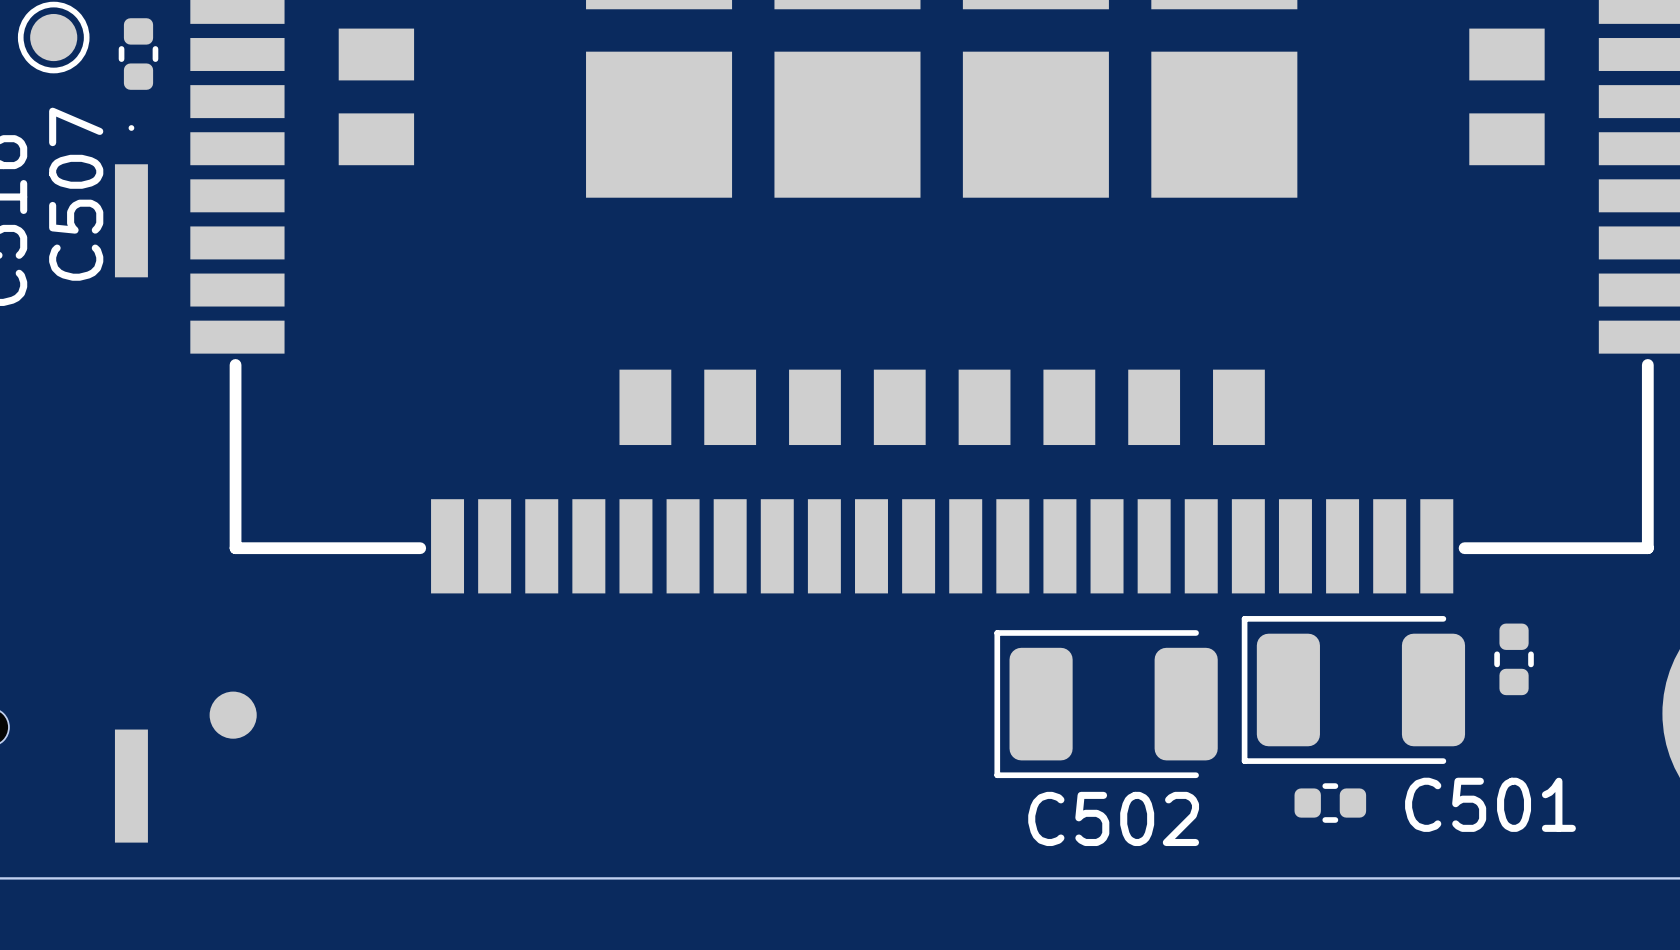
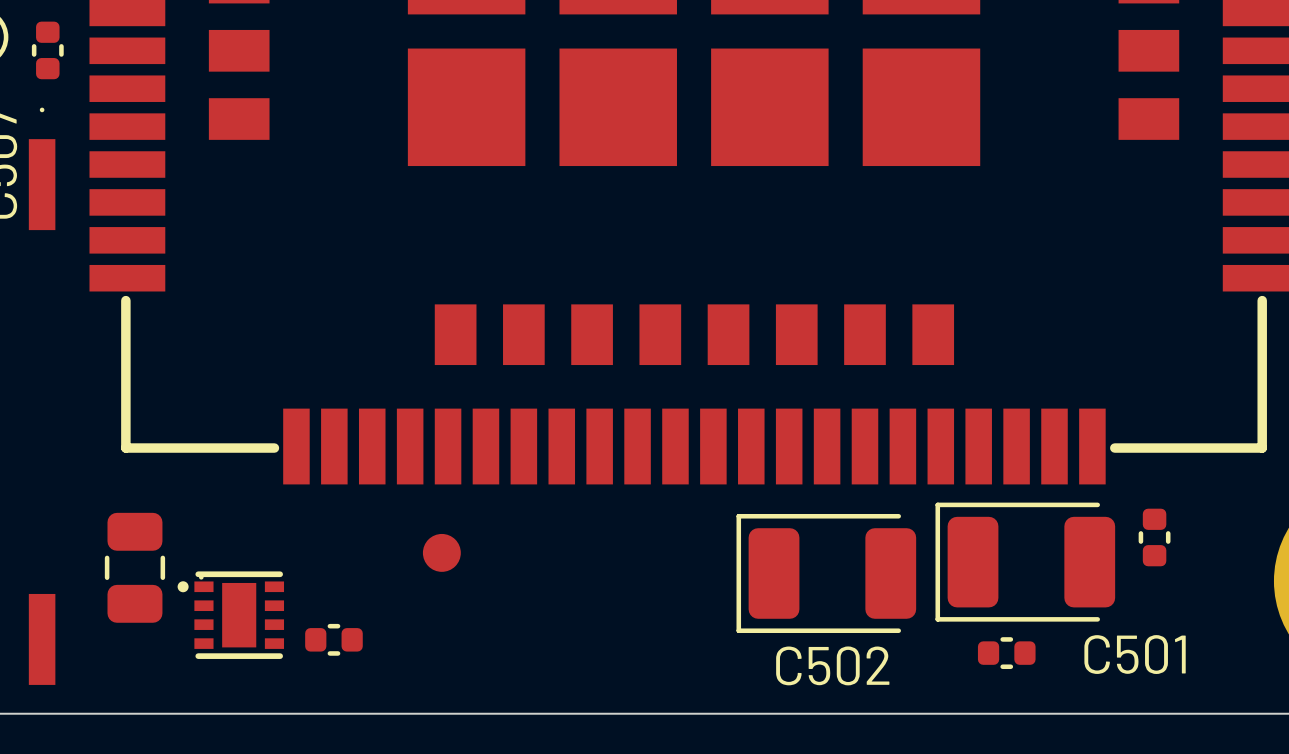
part: none -> (441, 552)
part footprint: [209, 691, 257, 739] -> [104, 512, 166, 623]
part: none -> (230, 615)
part: none -> (333, 639)

